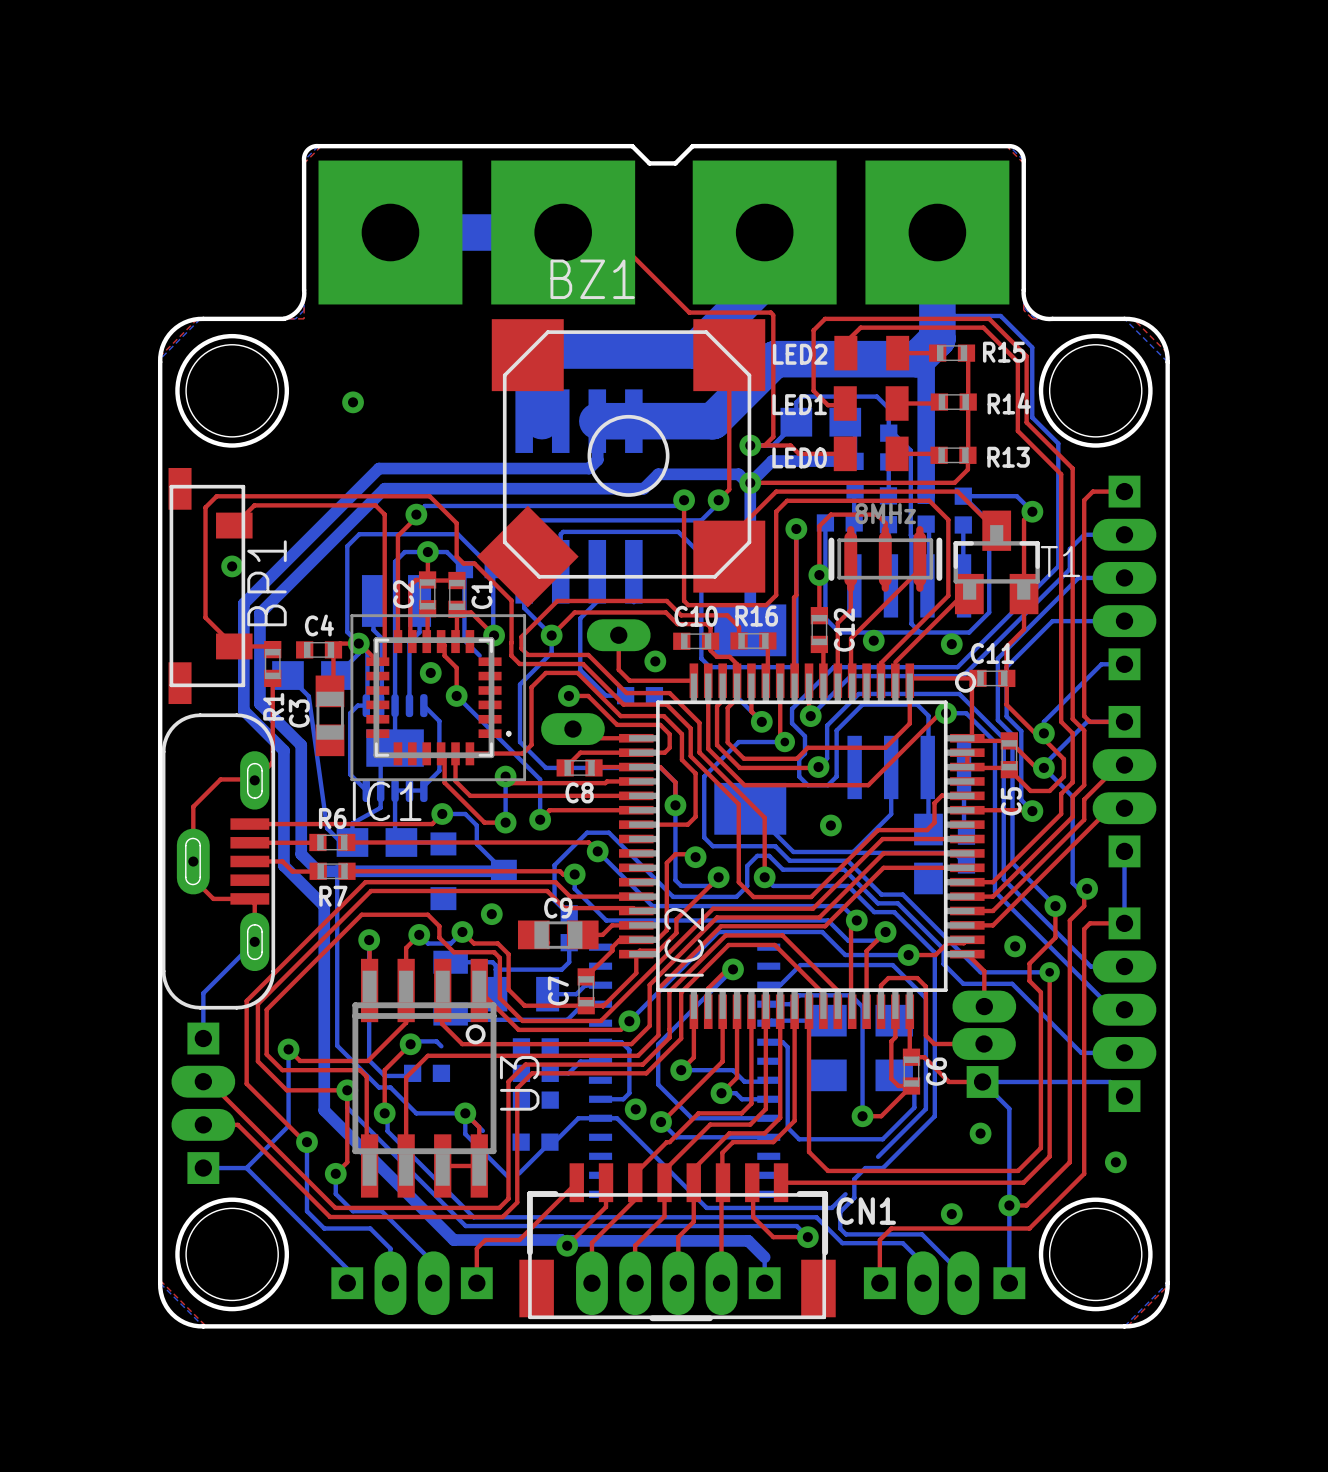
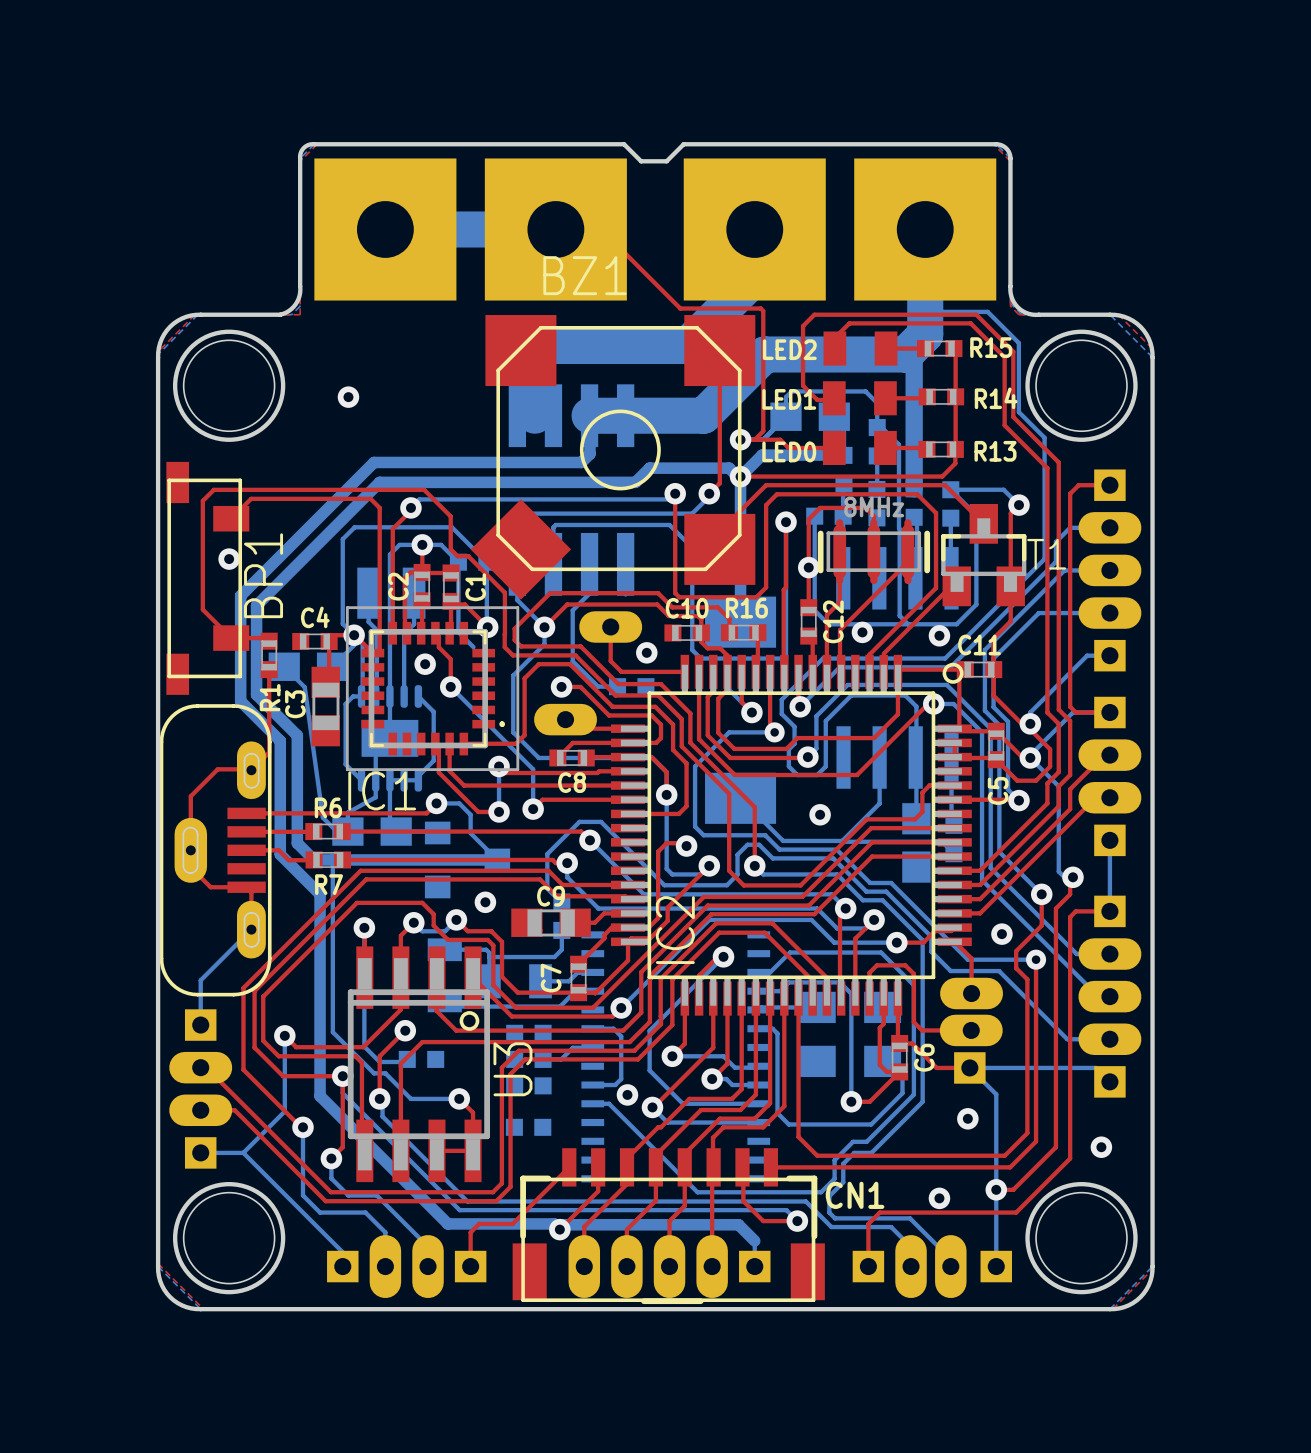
bottom track: (410, 1044) (413, 1041) (436, 1041) (441, 1046) -> none
bottom track: (600, 1118) (578, 1118) (554, 1142) (549, 1142) (519, 1173) -> none
bottom track: (482, 1130) (465, 1113) (465, 1134) (507, 1176) -> none
bottom track: none -> (866, 1141) (853, 1141) (834, 1160) (834, 1178)

